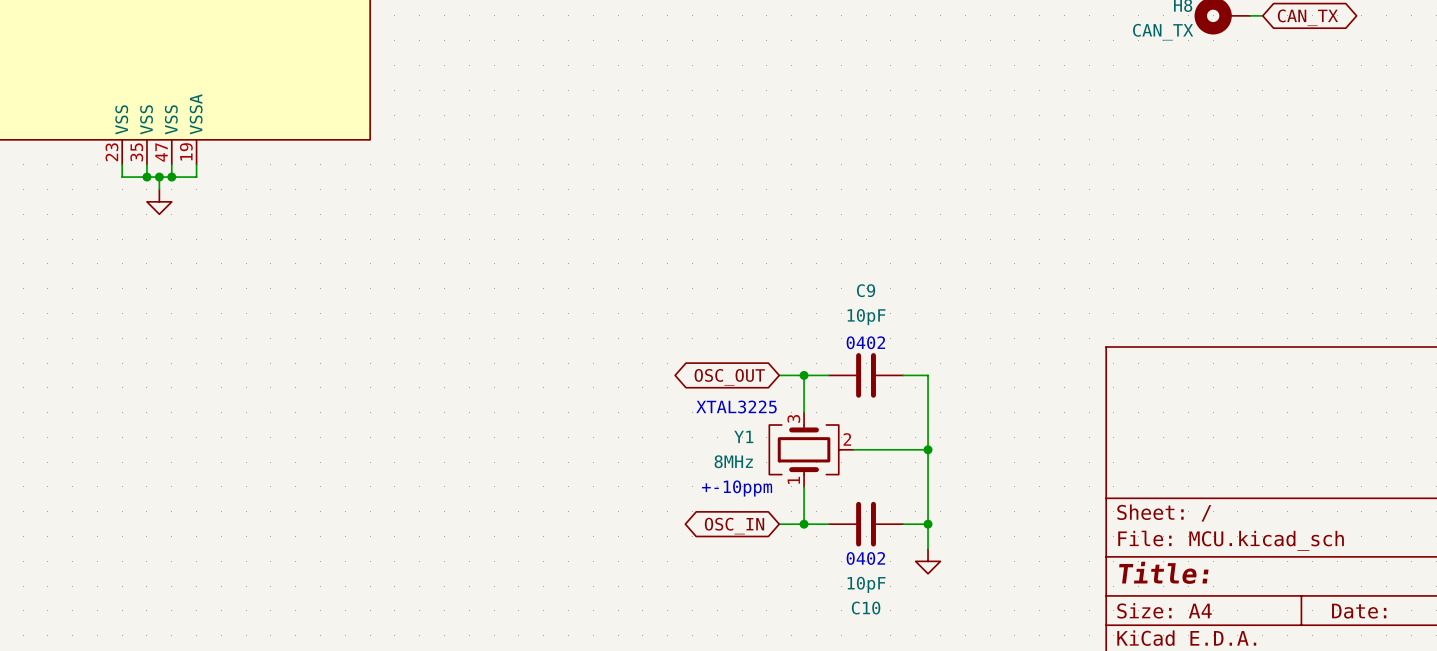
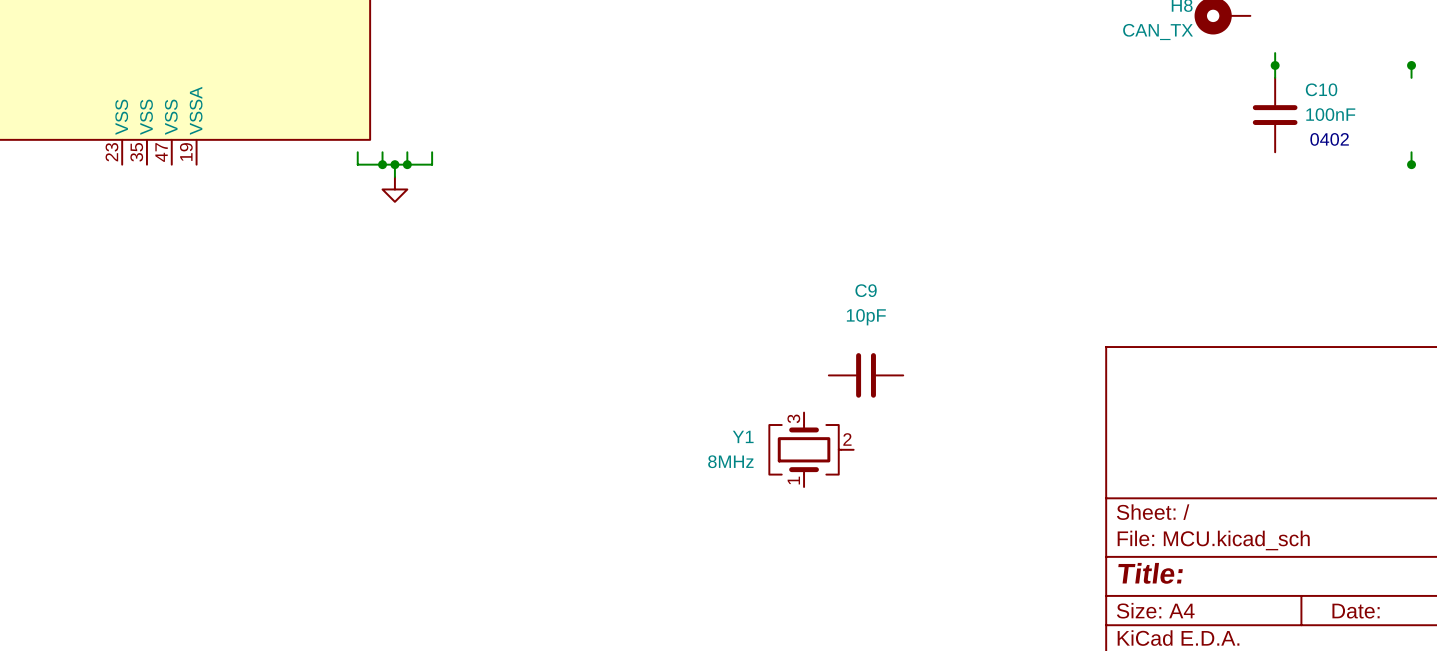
wire: (1250, 15) (1262, 15) -> none
global label: CAN_TX (1307, 17) -> none
wire: none -> (1275, 53) (1275, 77)
junction: none -> (1275, 65)
wire: none -> (1411, 65) (1411, 77)
junction: none -> (1411, 65)
text: none -> 0402 (1329, 139)
wire: none -> (1411, 152) (1411, 164)
wire: (122, 164) (122, 177) (196, 177) (196, 164) -> (357, 152) (357, 164) (432, 164) (432, 152)
wire: (146, 164) (146, 177) -> (382, 152) (382, 164)
wire: (171, 164) (171, 177) -> (407, 152) (407, 164)
junction: none -> (382, 164)
junction: none -> (394, 164)
junction: none -> (407, 164)
junction: none -> (1411, 164)
junction: (146, 177) -> none
wire: (159, 177) (159, 189) -> (394, 164) (394, 177)
junction: (159, 177) -> none
junction: (171, 177) -> none
power symbol position: (159, 201) -> (394, 189)
text: 0402 (865, 342) -> none
wire: (779, 375) (828, 375) -> none
wire: (804, 375) (804, 412) -> none
junction: (804, 375) -> none
wire: (903, 375) (928, 375) (928, 548) -> none
global label: OSC_OUT (729, 377) -> none
text: XTAL3225 (736, 406) -> none
wire: (853, 449) (928, 449) -> none
junction: (928, 449) -> none
wire: (804, 486) (804, 524) -> none
text: +-10ppm (737, 488) -> none
wire: (779, 524) (828, 524) -> none
junction: (804, 524) -> none
C10 rotation: 0° (866, 524) -> 90° clockwise (1275, 115)
C10 position: (866, 524) -> (1275, 115)
wire: (903, 524) (928, 524) -> none
junction: (928, 524) -> none
global label: OSC_IN (734, 526) -> none
text: 0402 (865, 558) -> none
power symbol: (928, 561) -> none
C10 value: 10pF (866, 584) -> 100nF (1330, 114)
C10 name position: C10 (866, 608) -> C10 (1321, 89)

